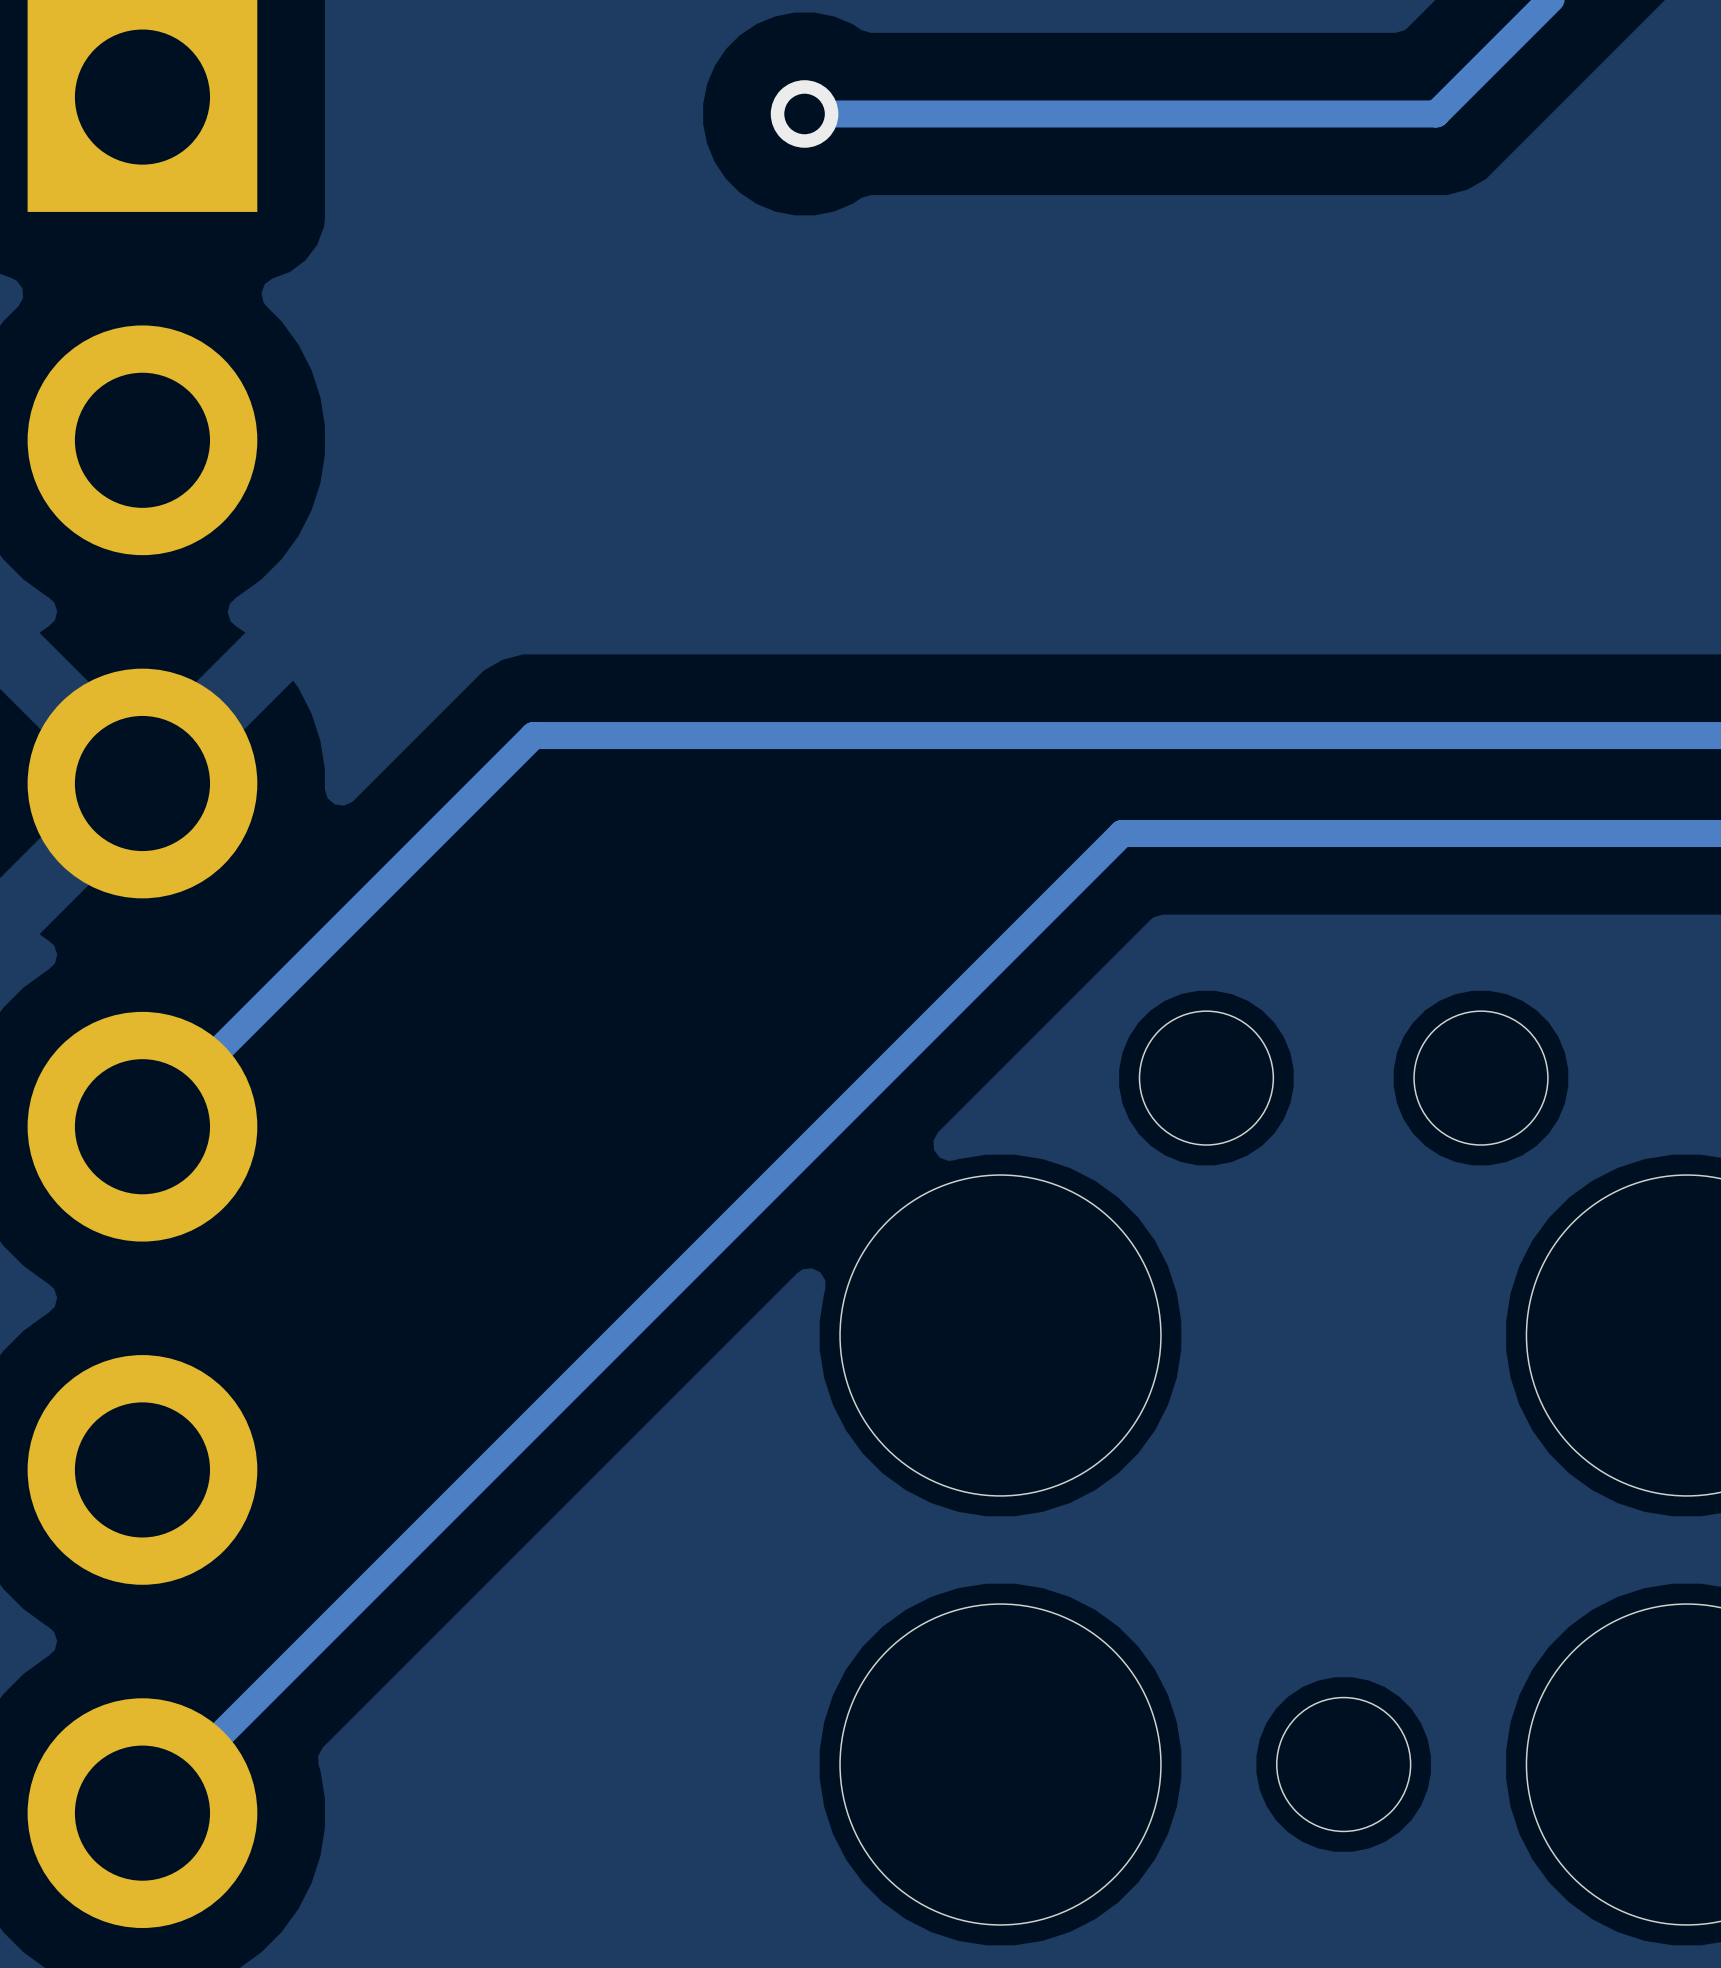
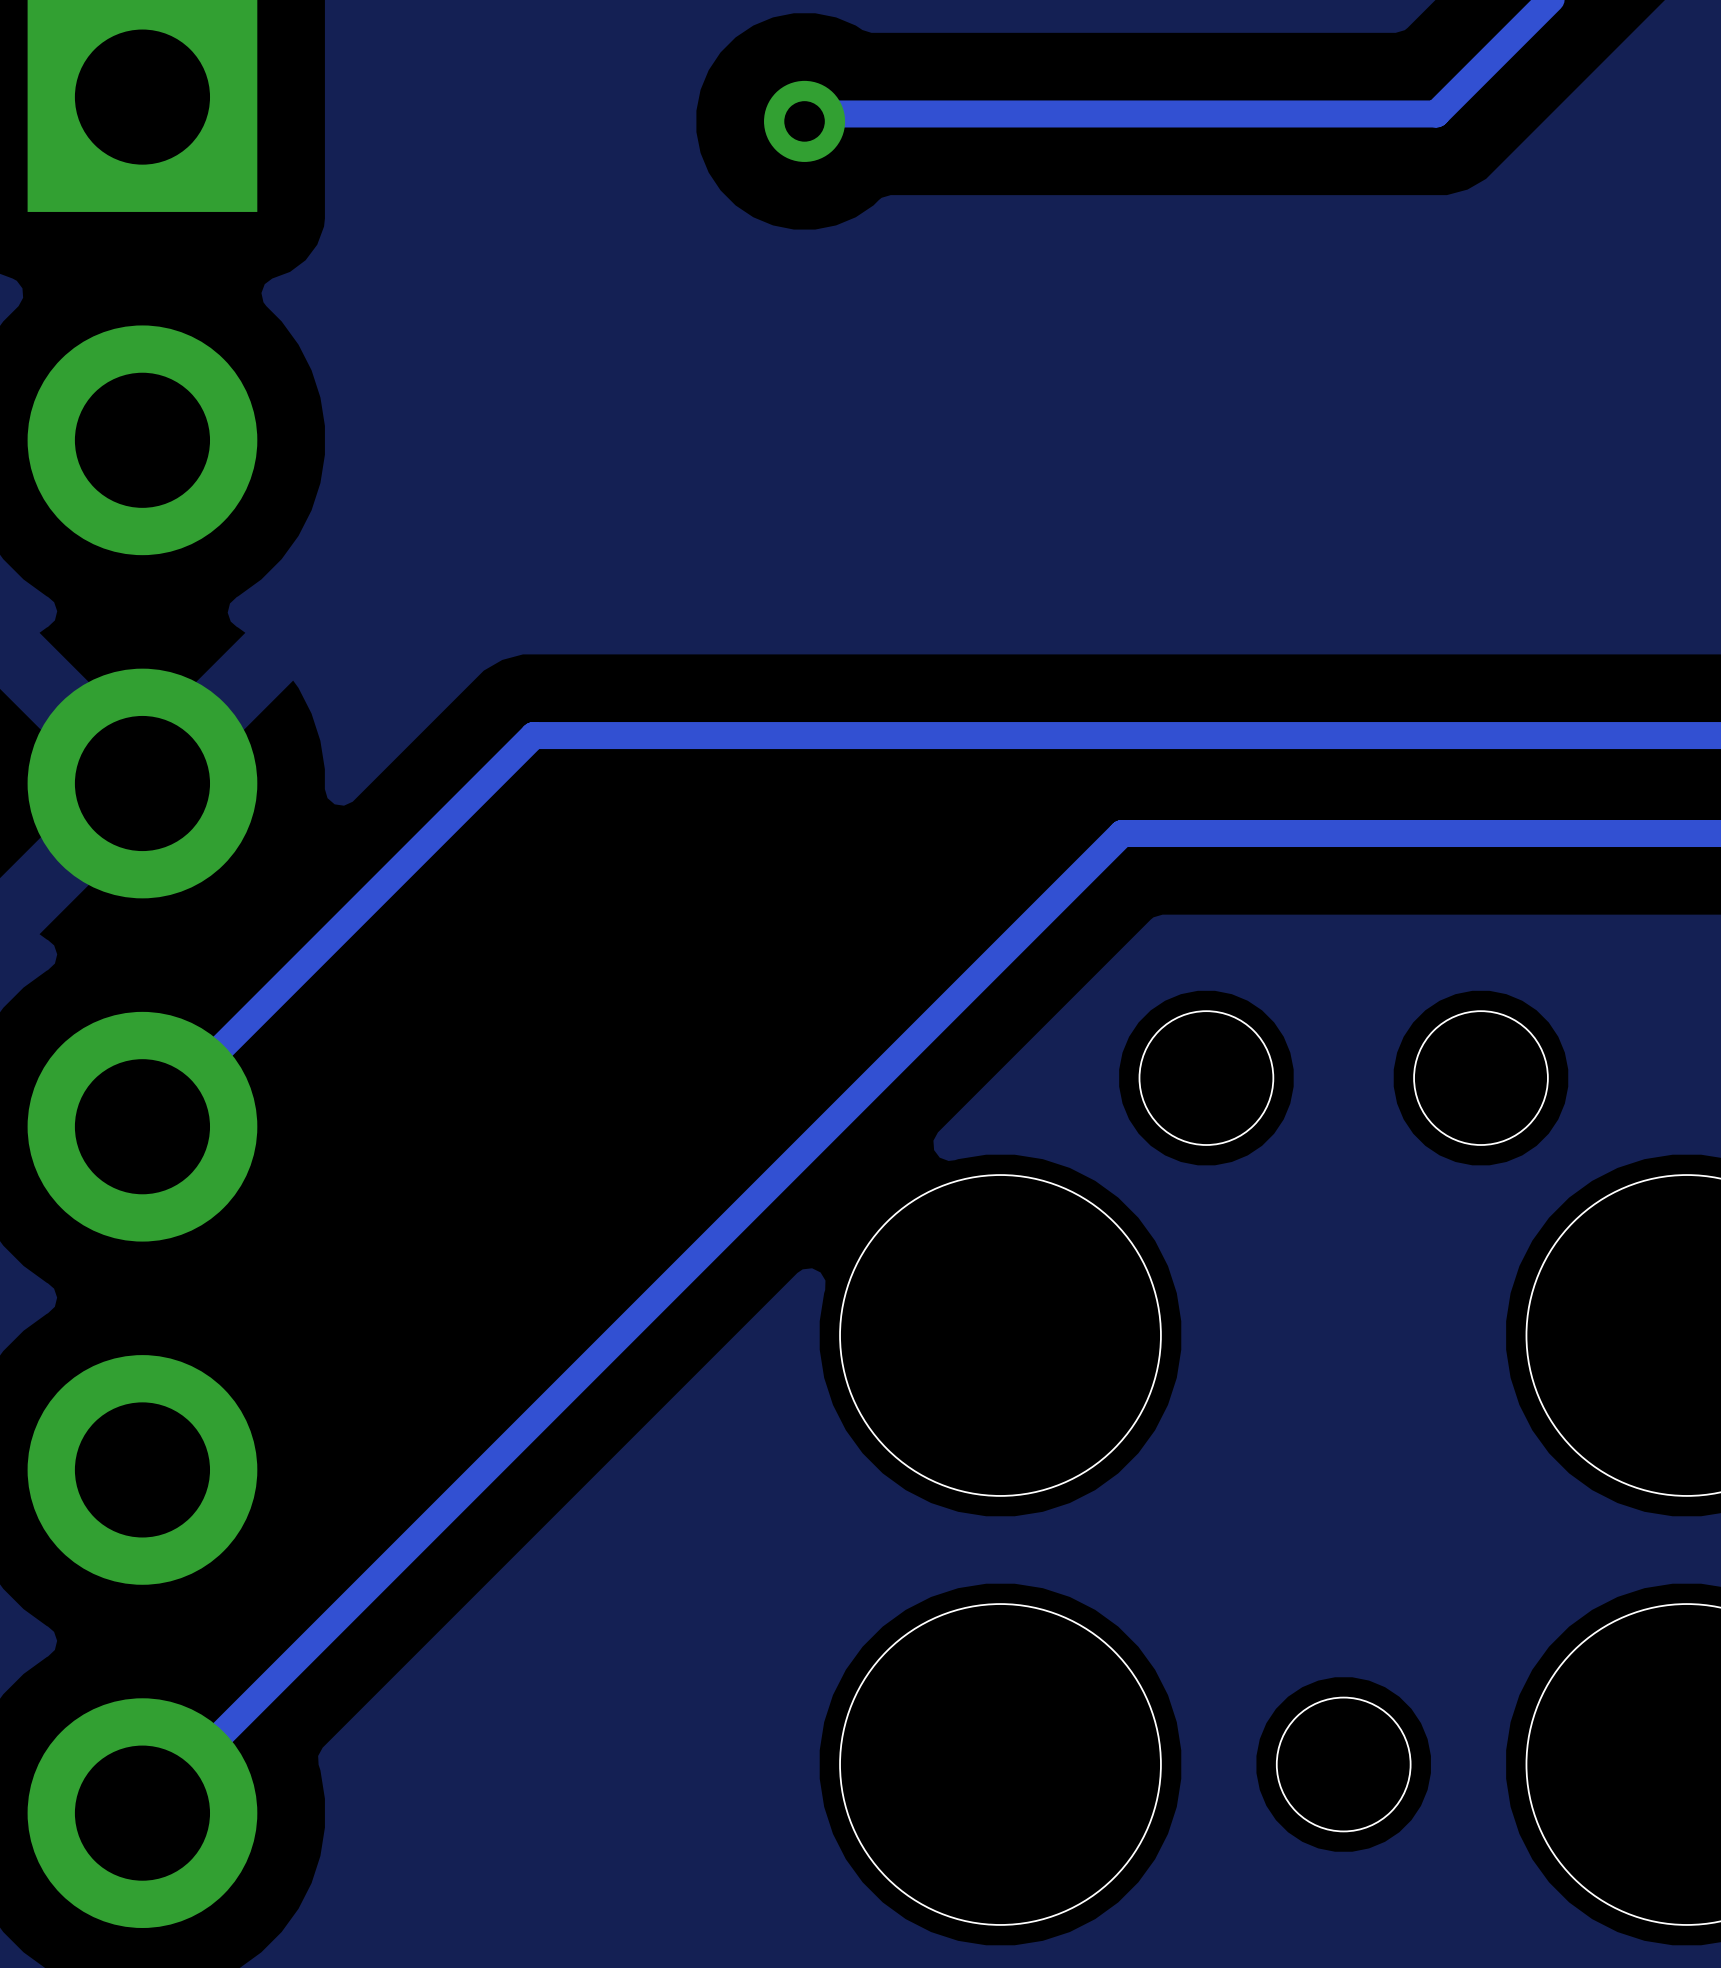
via size: [770, 80, 839, 148] -> [764, 80, 846, 162]

